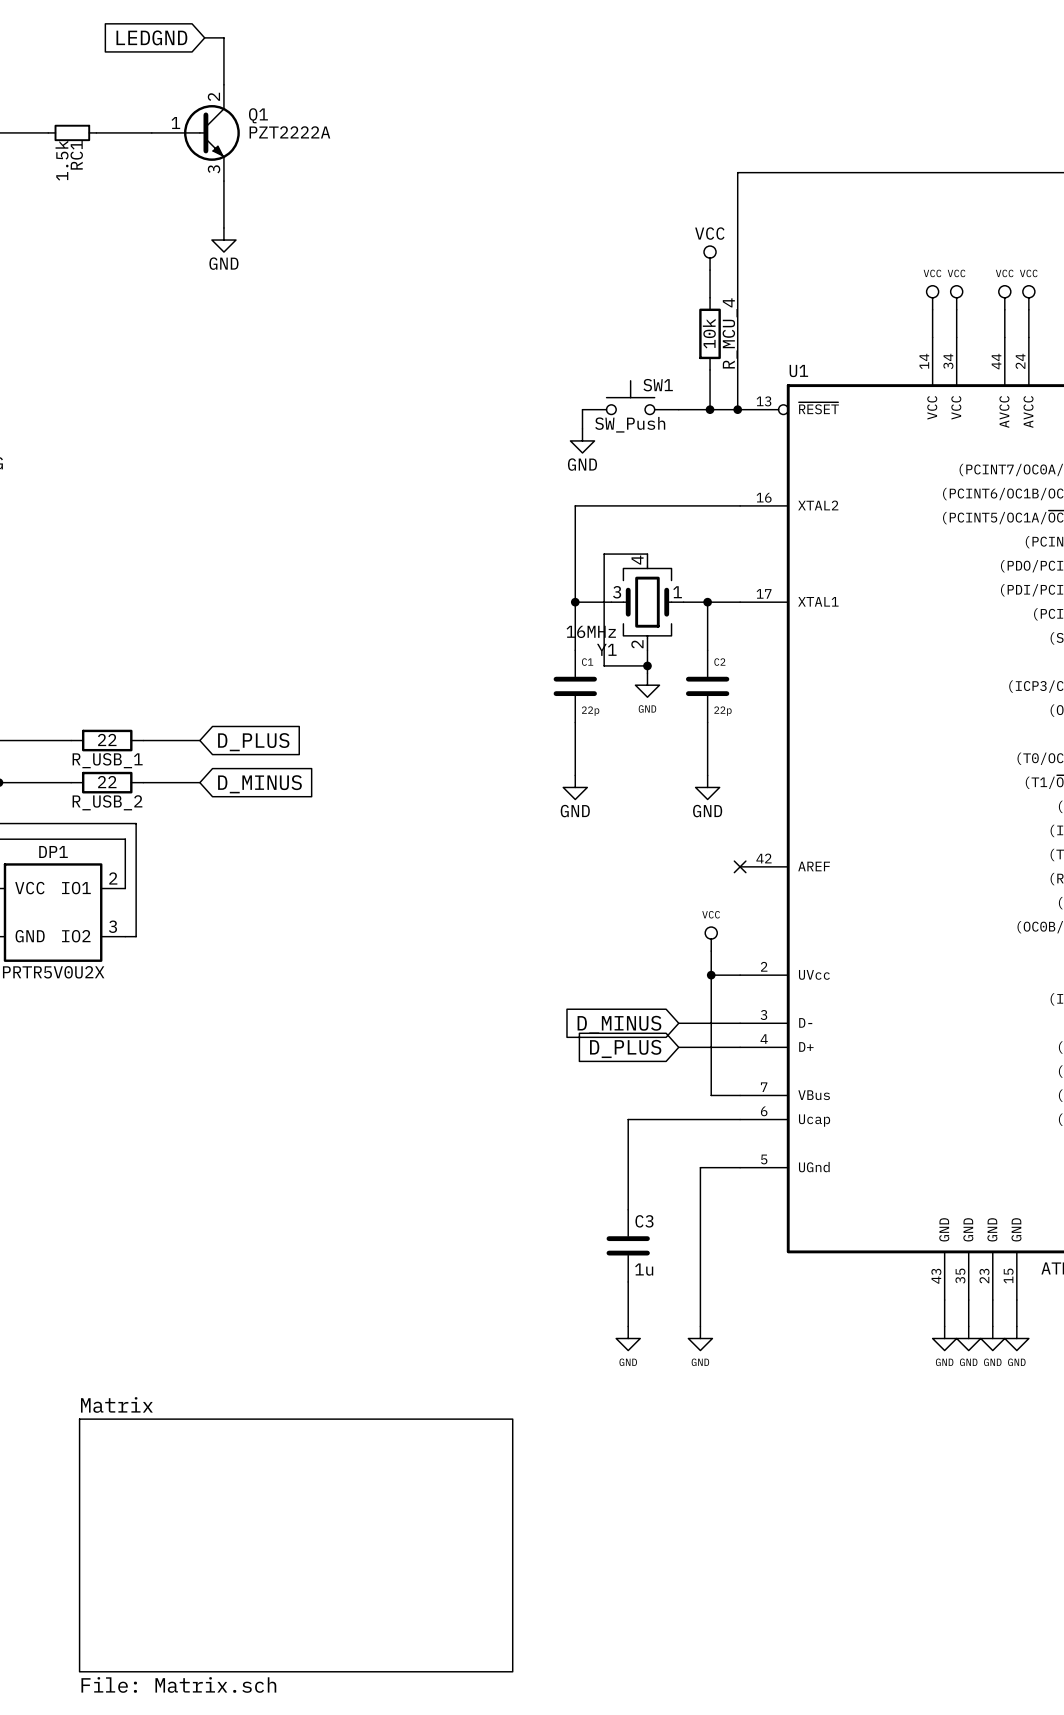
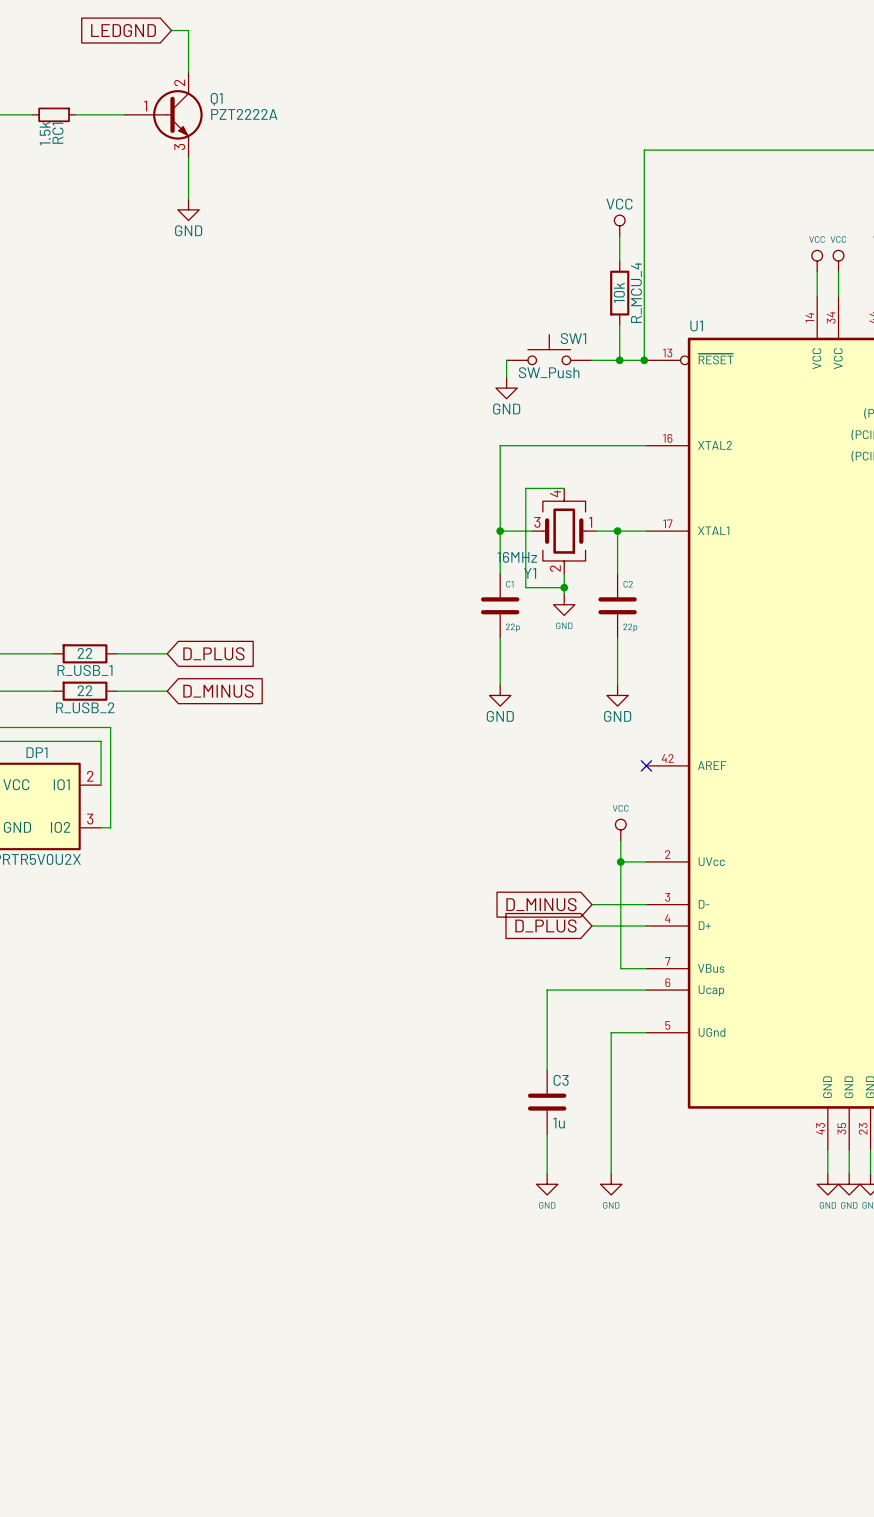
sheet Matrix: File: Matrix.sch (296, 1545) -> none

